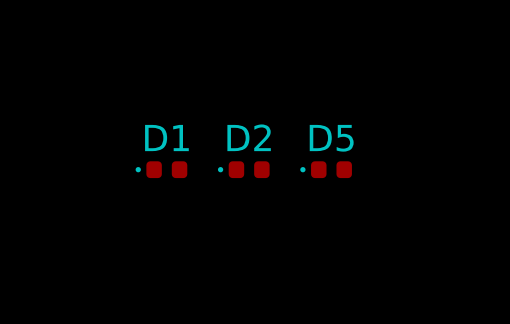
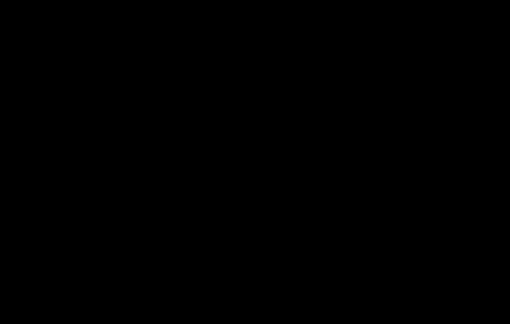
D1: (161, 169) -> none
D2: (243, 169) -> none
D5: (326, 169) -> none

